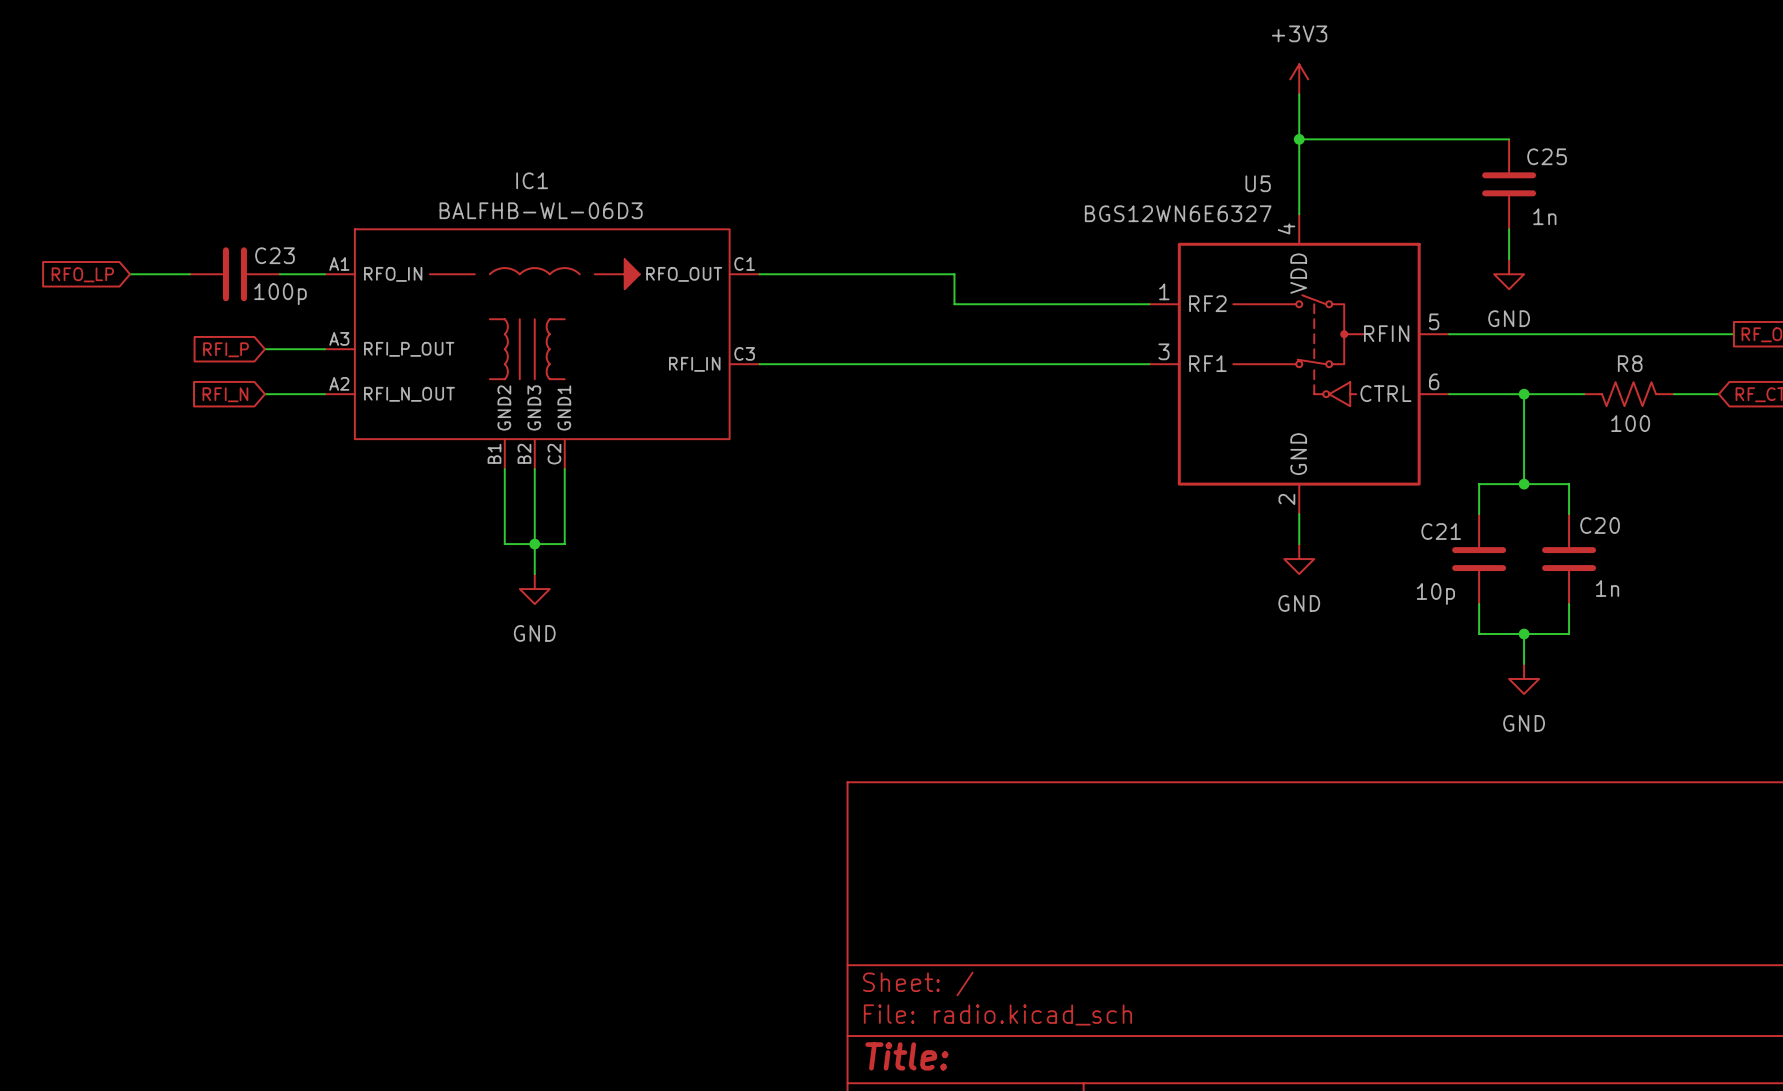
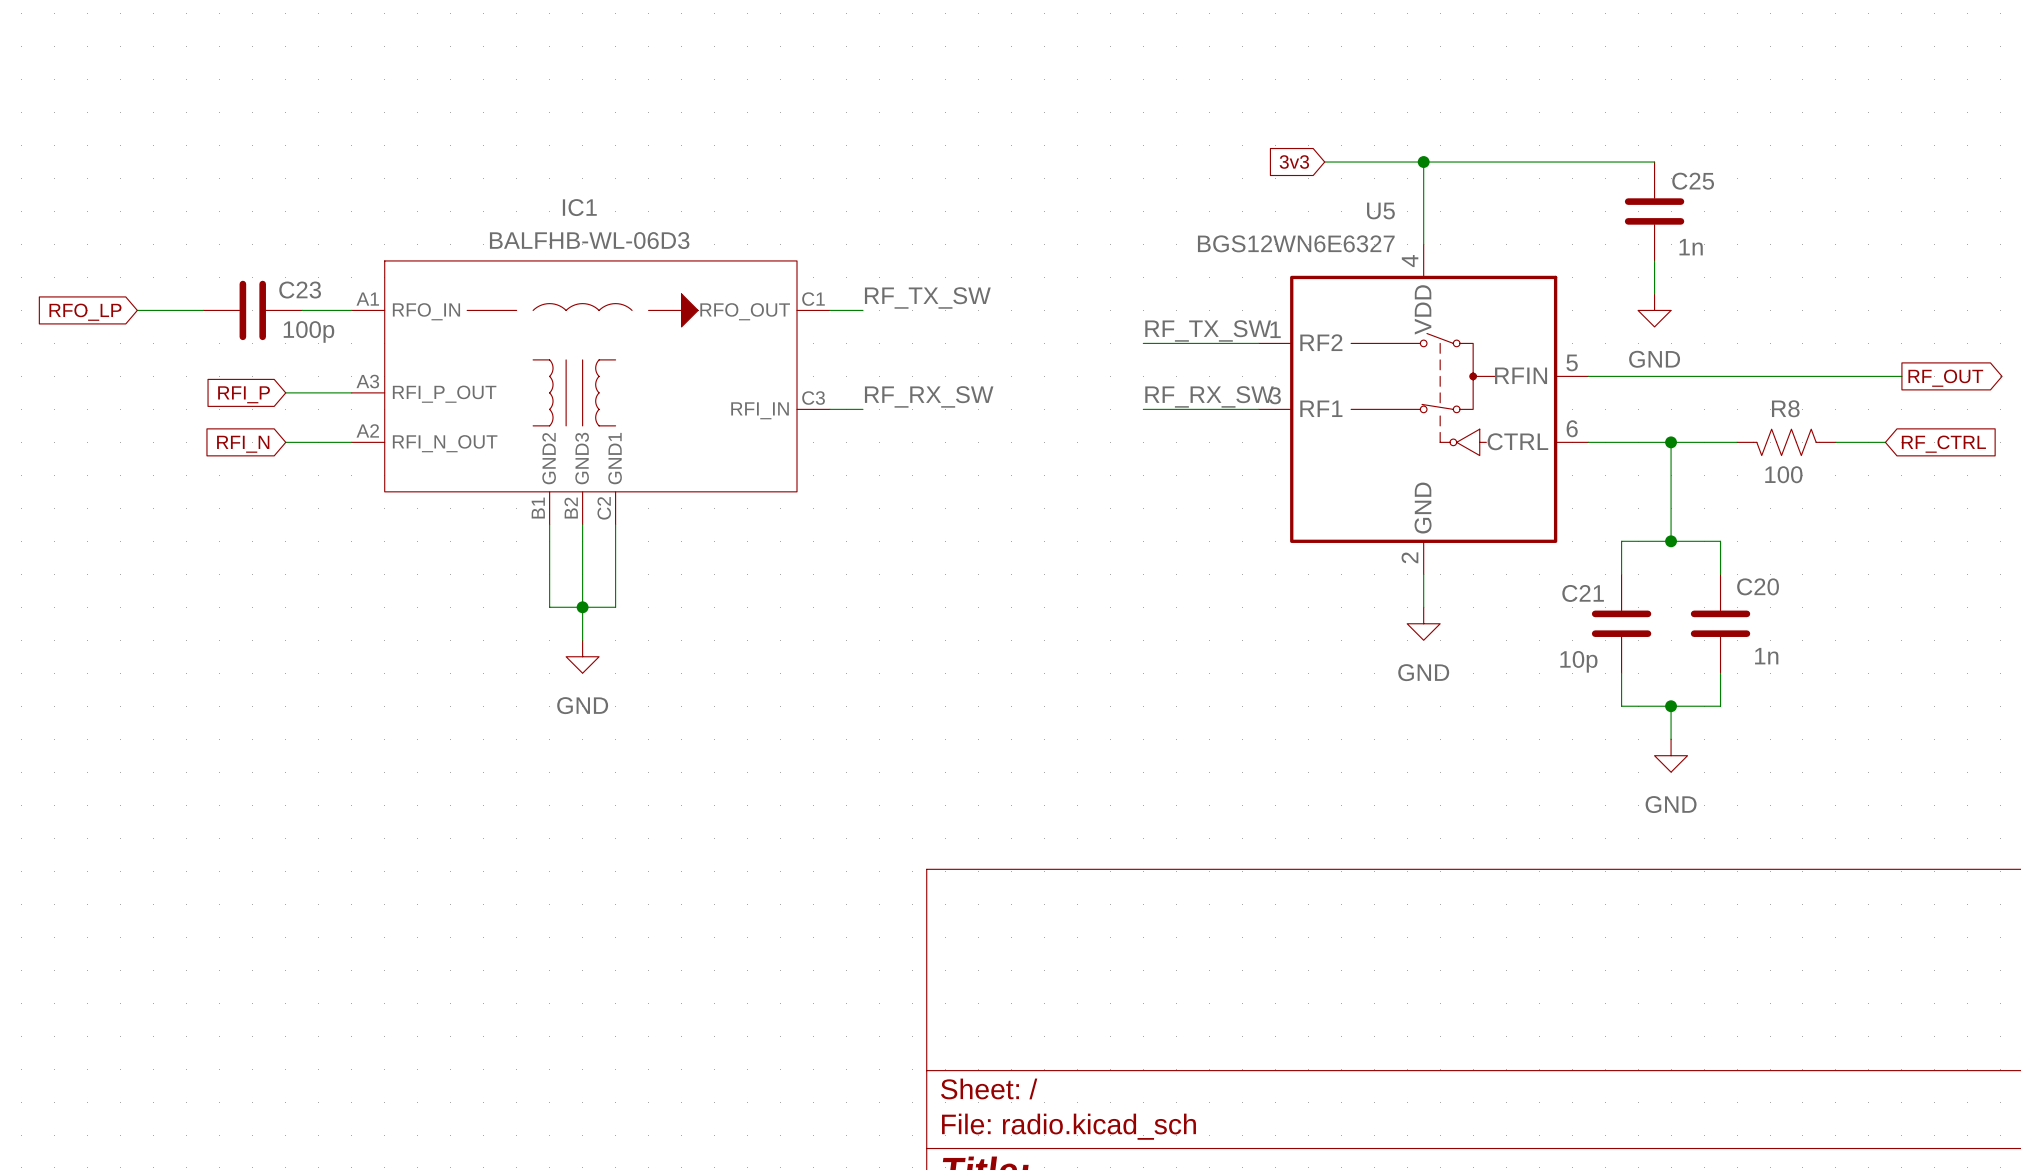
power symbol: +3V3 (1299, 79) -> none
wire: (1299, 94) (1299, 139) -> (1324, 162) (1423, 162)
global label: none -> 3v3 (1294, 162)
label: none -> RF_TX_SW (927, 297)
wire: (789, 274) (954, 274) (954, 304) (1044, 304) -> none
label: none -> RF_TX_SW (1208, 330)
label: none -> RF_RX_SW (929, 396)
label: none -> RF_RX_SW (1209, 396)
wire: (789, 364) (1044, 364) -> none

